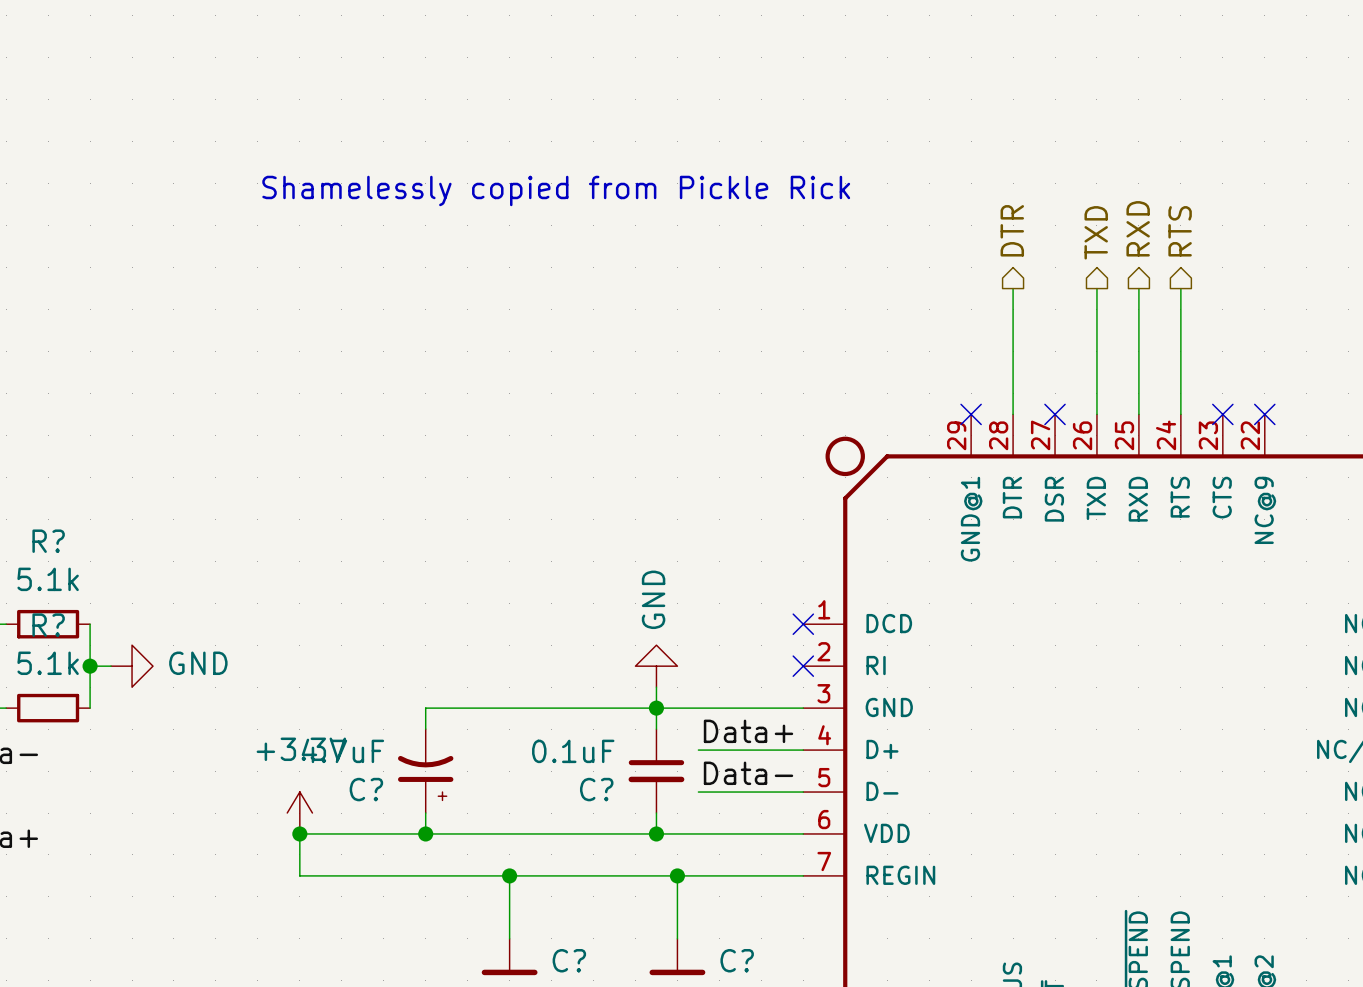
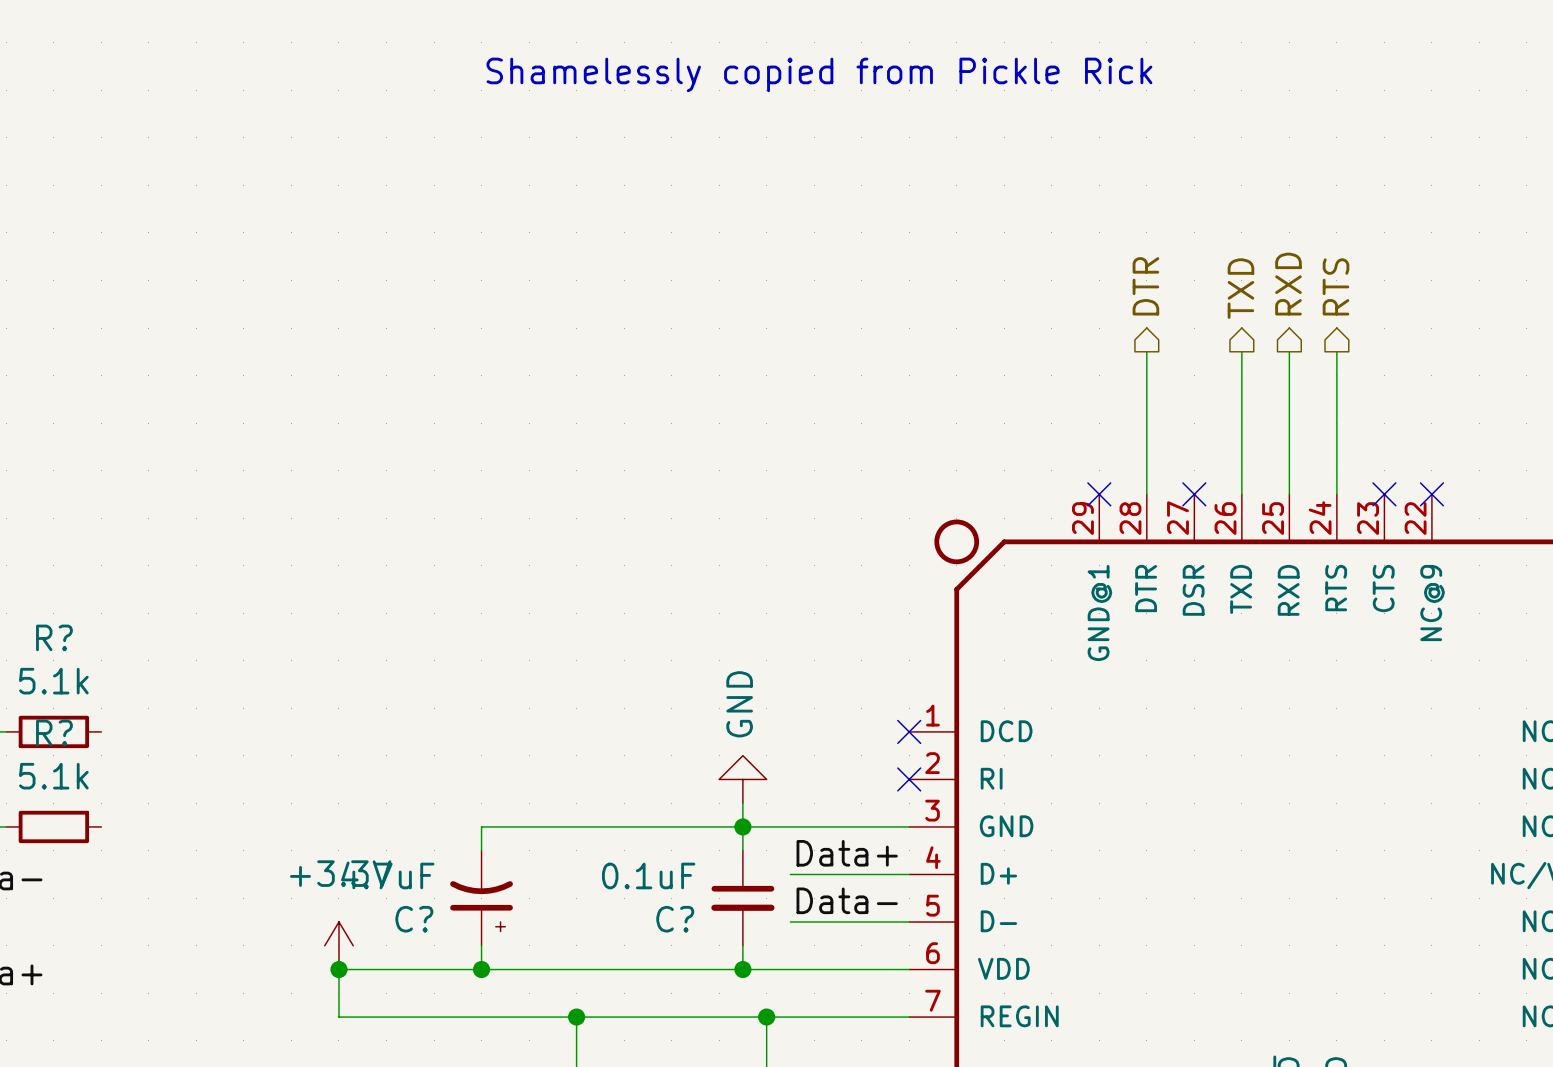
text position: Shamelessly copied from Pickle Rick (556, 190) -> Shamelessly copied from Pickle Rick (819, 74)
wire: (90, 624) (90, 708) -> none
wire: (90, 666) (111, 666) -> none
junction: (90, 666) -> none
power symbol: GND (132, 666) -> none

